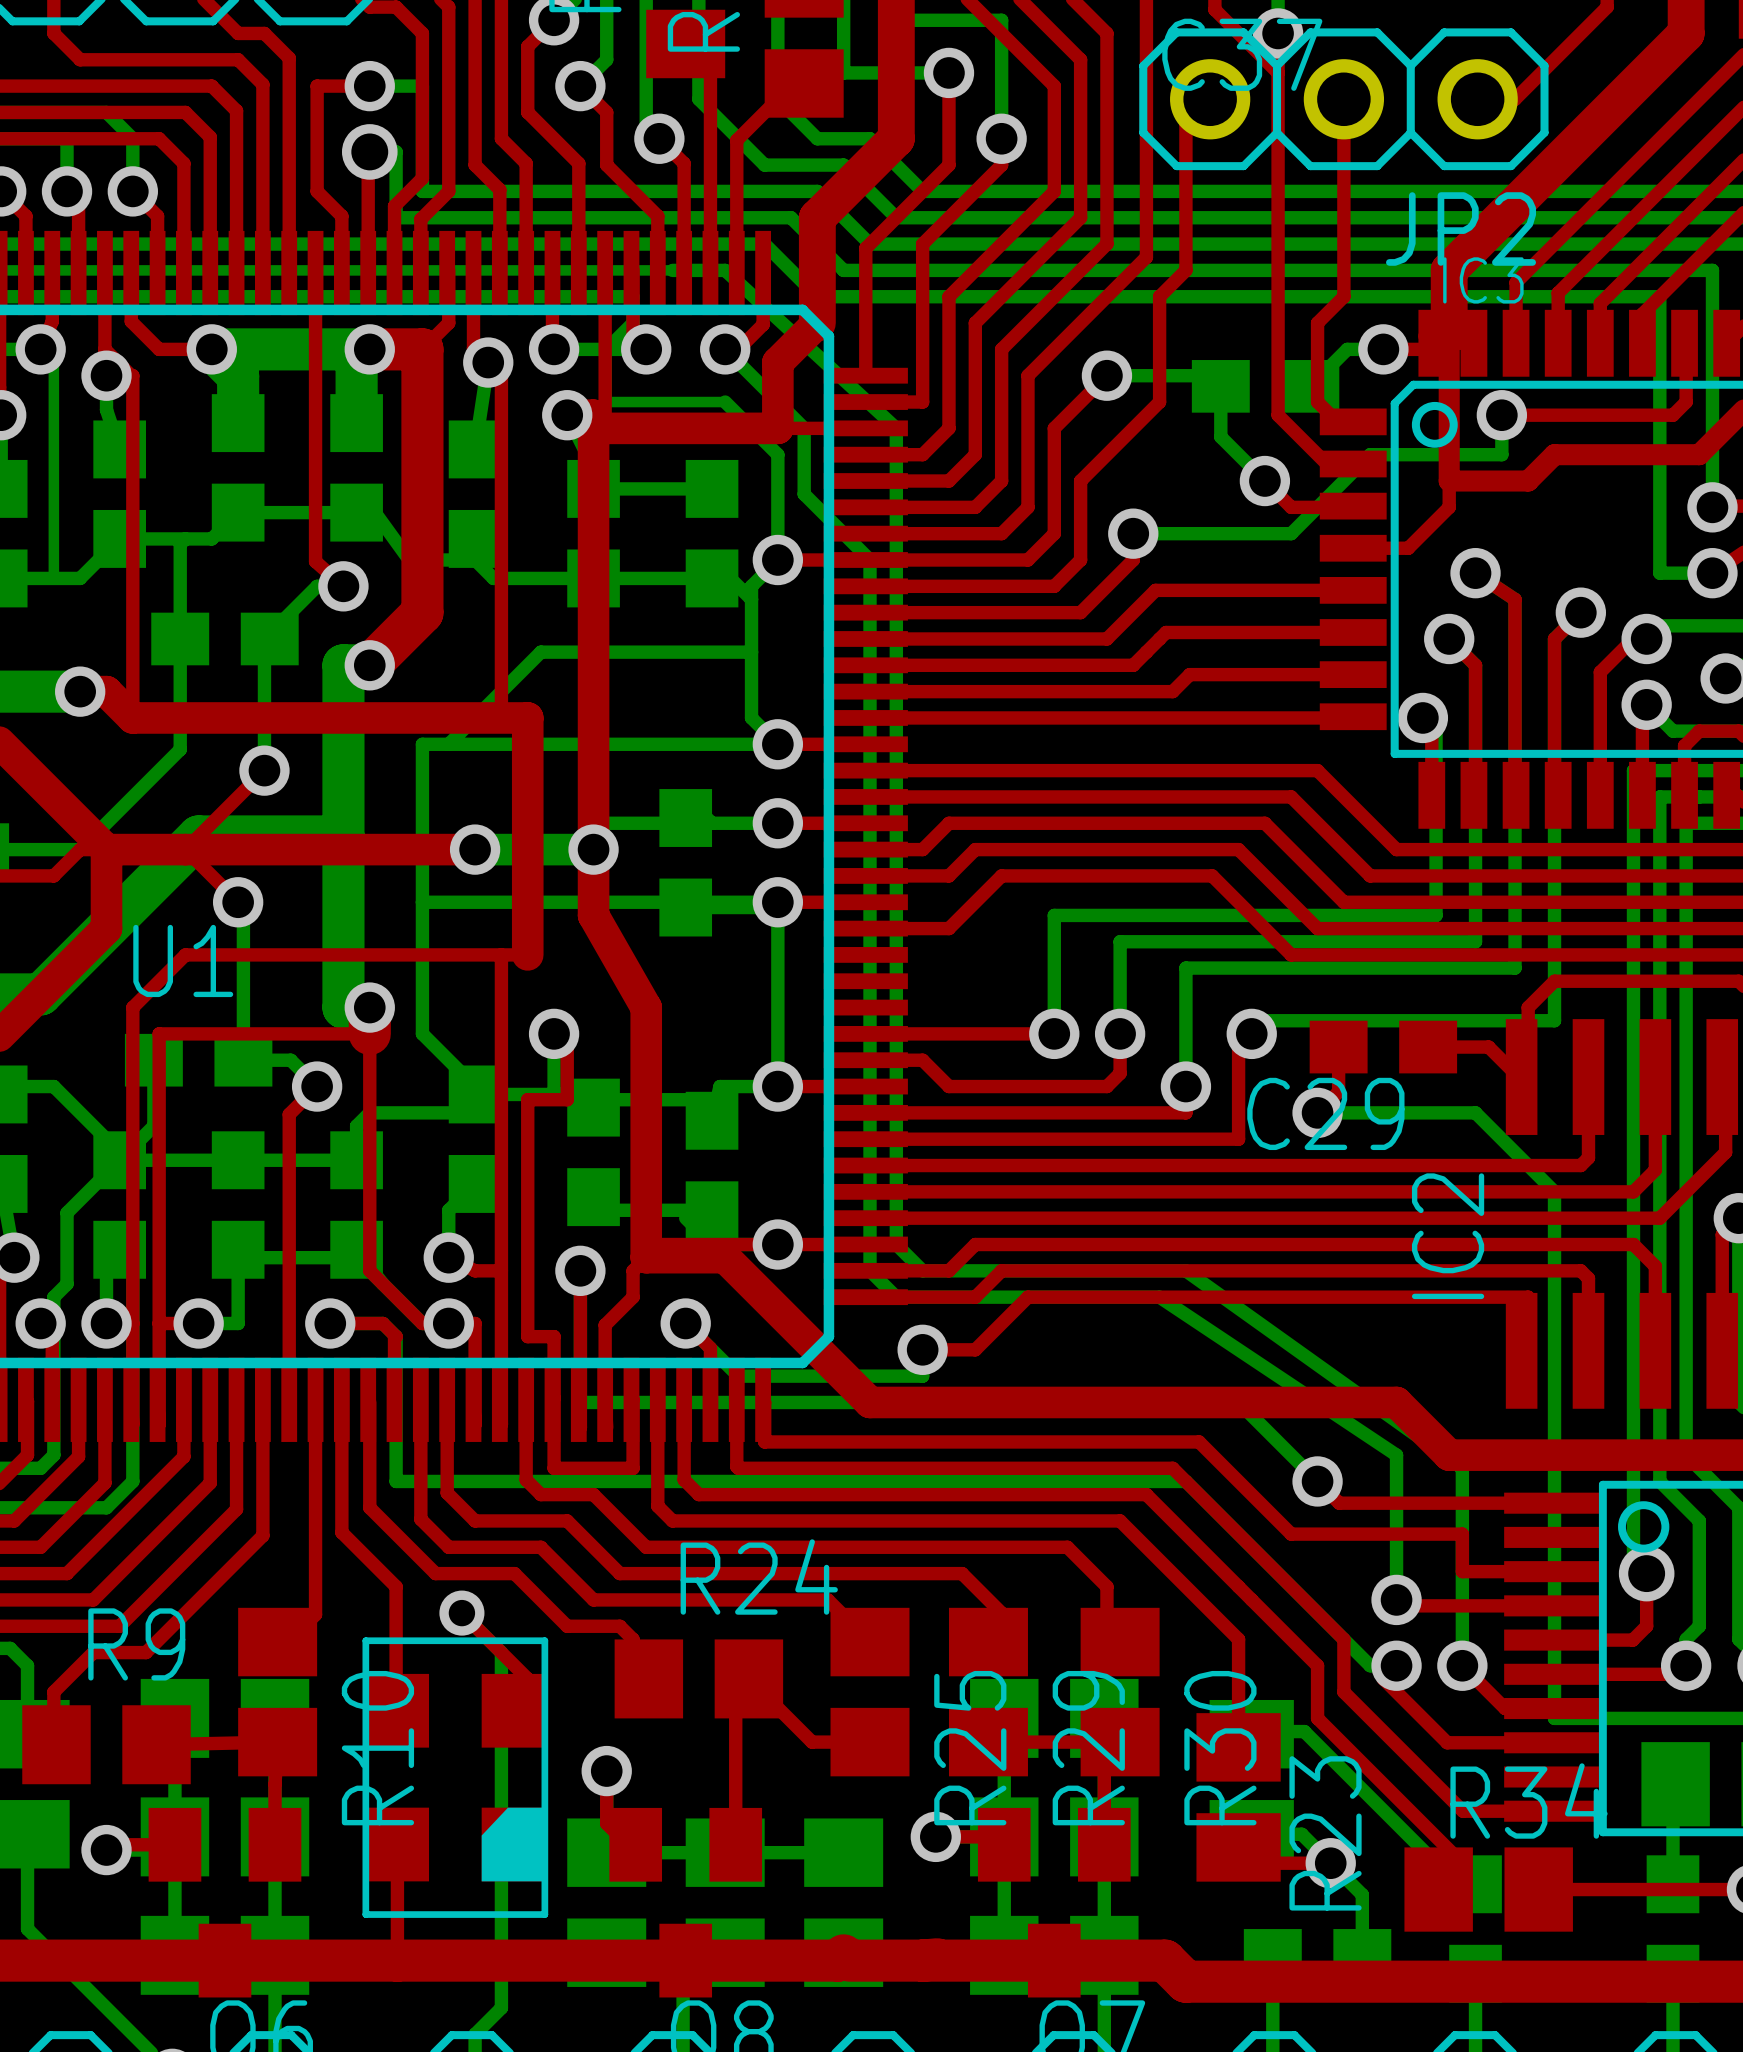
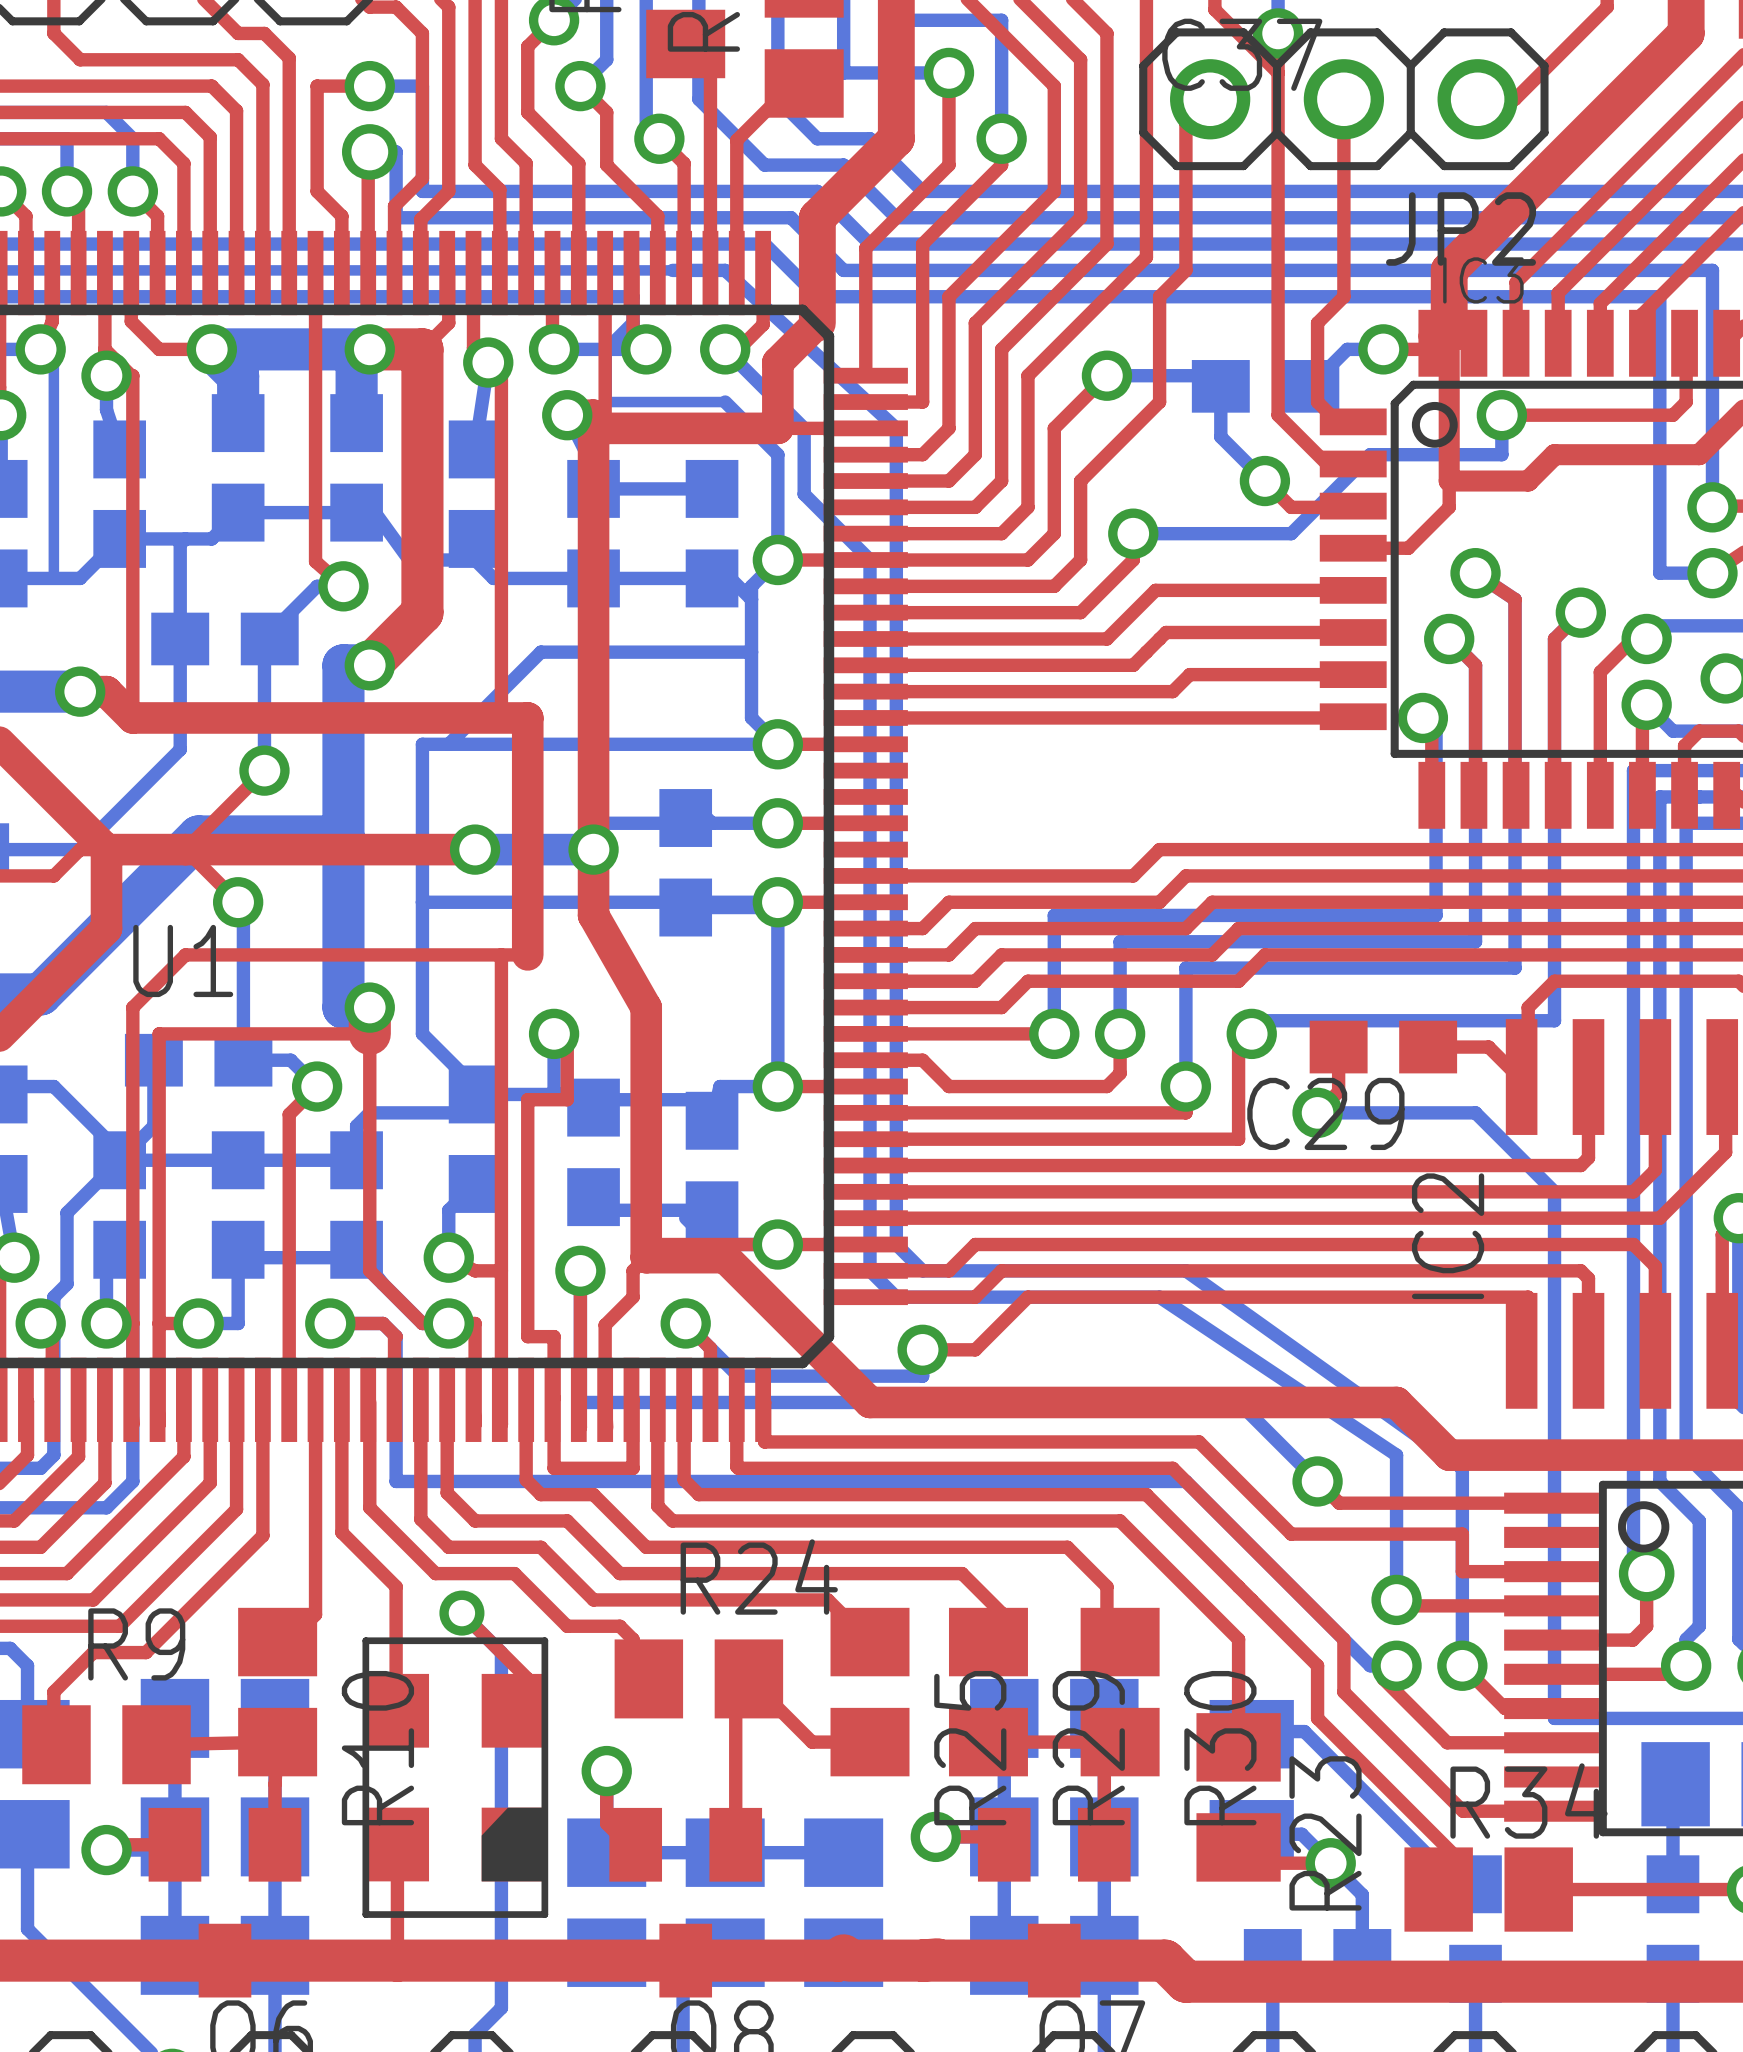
top track: (865, 770) (1317, 770) (1396, 849) -> none
top track: (865, 796) (1291, 796) (1370, 875) -> none
top track: (865, 849) (922, 849) (948, 823) (1264, 823) (1343, 902) -> (865, 954) (948, 954) (975, 928) (1185, 928) (1212, 902) (1343, 902)
top track: (1159, 849) (975, 849) (948, 875) -> none
top track: (1238, 849) (1317, 928) -> (1238, 849) (1396, 849)
top track: (1001, 875) (948, 928) (922, 928) -> (1001, 875) (948, 875)
top track: (1133, 875) (1185, 875) -> (1133, 875) (1159, 849)
top track: none -> (1185, 875) (1159, 902) (948, 902) (922, 928)
top track: (1212, 875) (1291, 954) -> (1212, 875) (1370, 875)
top track: none -> (1317, 928) (1238, 928) (1212, 954) (1001, 954) (975, 981) (865, 981)
top track: none -> (1291, 954) (1264, 954) (1238, 981) (1027, 981) (1001, 1007) (865, 1007)

